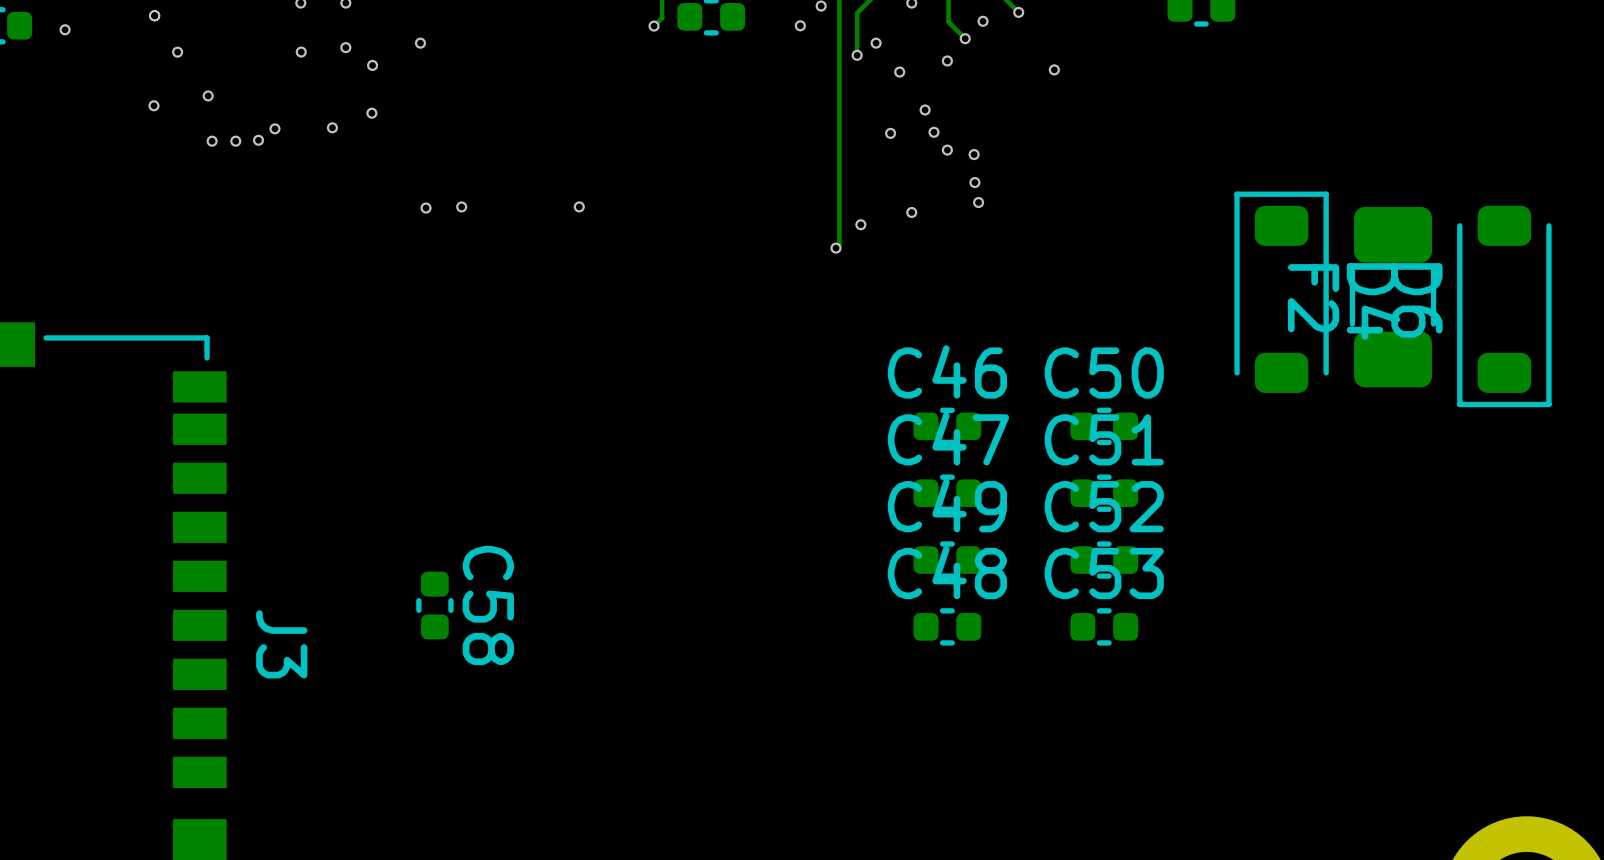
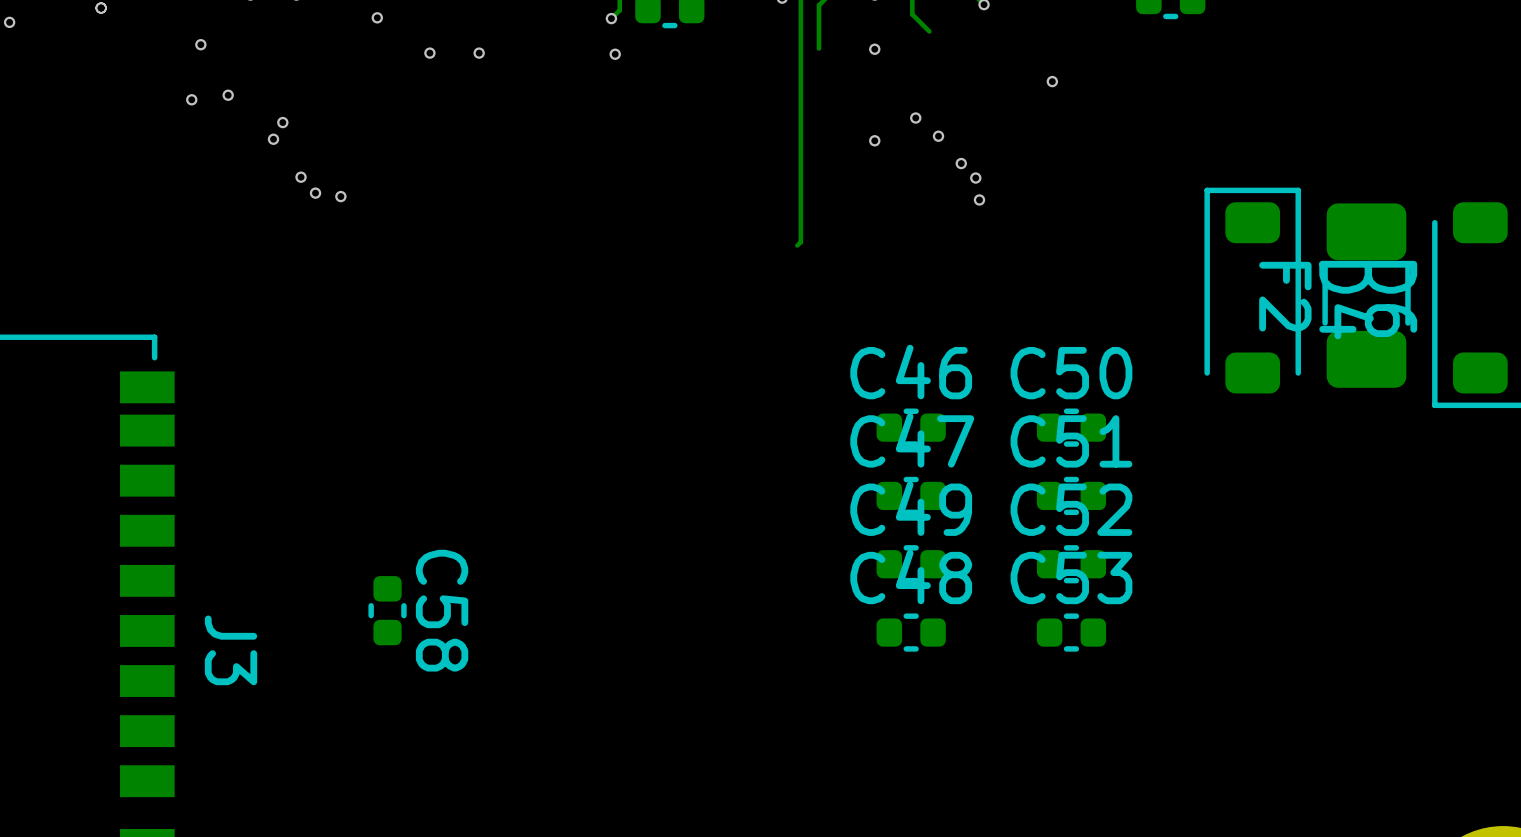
via: (983, 21) -> none
via: (800, 25) -> none
via: (965, 38) -> none
via position: (420, 43) -> (377, 17)
via: (876, 43) -> none
via: (345, 47) -> none
via: none -> (200, 44)
via: (177, 52) -> none
via: (301, 52) -> none
via: (857, 55) -> none
via: none -> (874, 49)
via: none -> (429, 53)
via: none -> (479, 53)
via: none -> (615, 54)
via: (947, 60) -> none
via: (372, 65) -> none
via position: (1054, 69) -> (1052, 81)
via: (899, 72) -> none
via: (208, 95) -> none
via: none -> (228, 95)
via: (153, 105) -> none
via: none -> (191, 99)
via: (925, 109) -> none
via: (371, 113) -> none
via: none -> (915, 118)
via: (274, 128) -> none
via: (934, 132) -> none
via: (890, 133) -> none
via: (258, 140) -> none
via: (212, 141) -> none
via: (235, 141) -> none
via: none -> (938, 136)
via: none -> (273, 139)
via: none -> (874, 140)
via: (947, 150) -> none
via: (974, 154) -> none
via: none -> (961, 163)
via: none -> (301, 177)
via: (974, 182) -> none
via: none -> (975, 178)
via: none -> (315, 193)
via: none -> (340, 196)
via: (978, 202) -> none
via: none -> (979, 199)
via: (461, 206) -> none
via: (579, 206) -> none
via: (426, 208) -> none
via: (911, 212) -> none
via: (860, 224) -> none
via: (835, 248) -> none

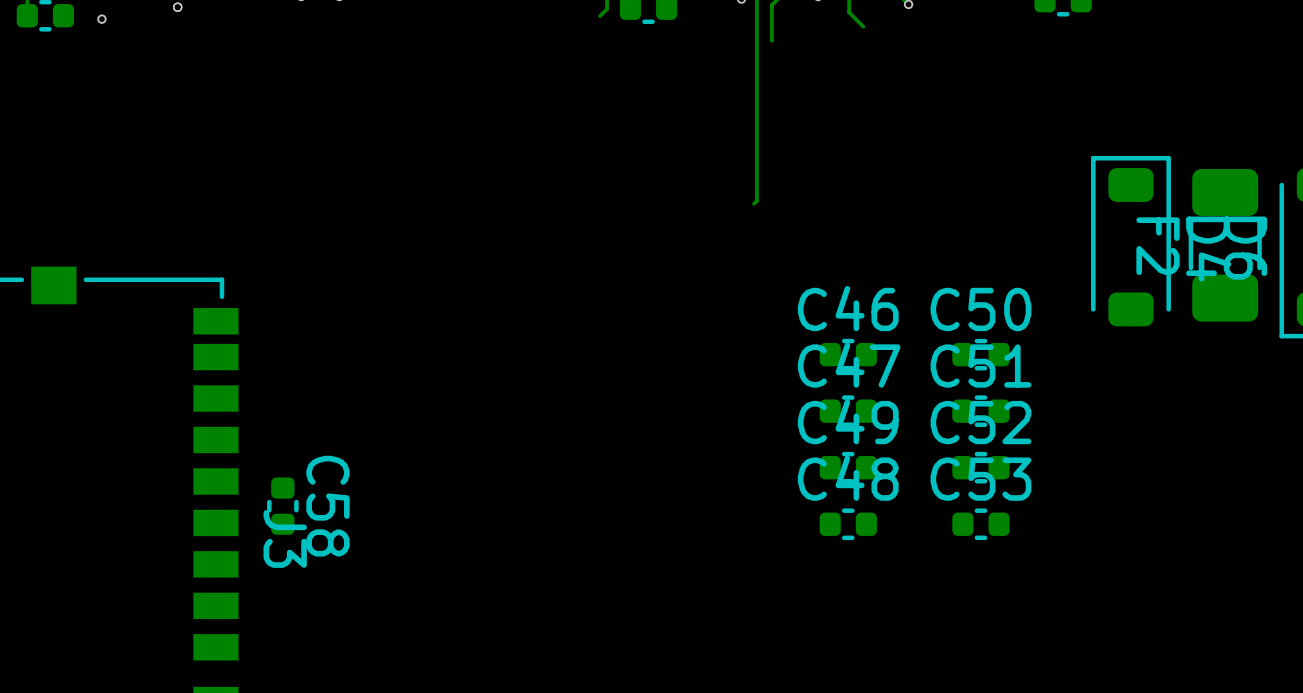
via: (377, 17) -> none
via: (611, 18) -> none
via: (200, 44) -> none
via: (874, 49) -> none
via: (429, 53) -> none
via: (479, 53) -> none
via: (615, 54) -> none
via: (1052, 81) -> none
via: (228, 95) -> none
via: (191, 99) -> none
via: (915, 118) -> none
via: (282, 122) -> none
via: (938, 136) -> none
via: (273, 139) -> none
via: (874, 140) -> none
via: (961, 163) -> none
via: (301, 177) -> none
via: (975, 178) -> none
via: (315, 193) -> none
via: (340, 196) -> none
via: (979, 199) -> none
C58 position: (387, 610) -> (282, 506)

